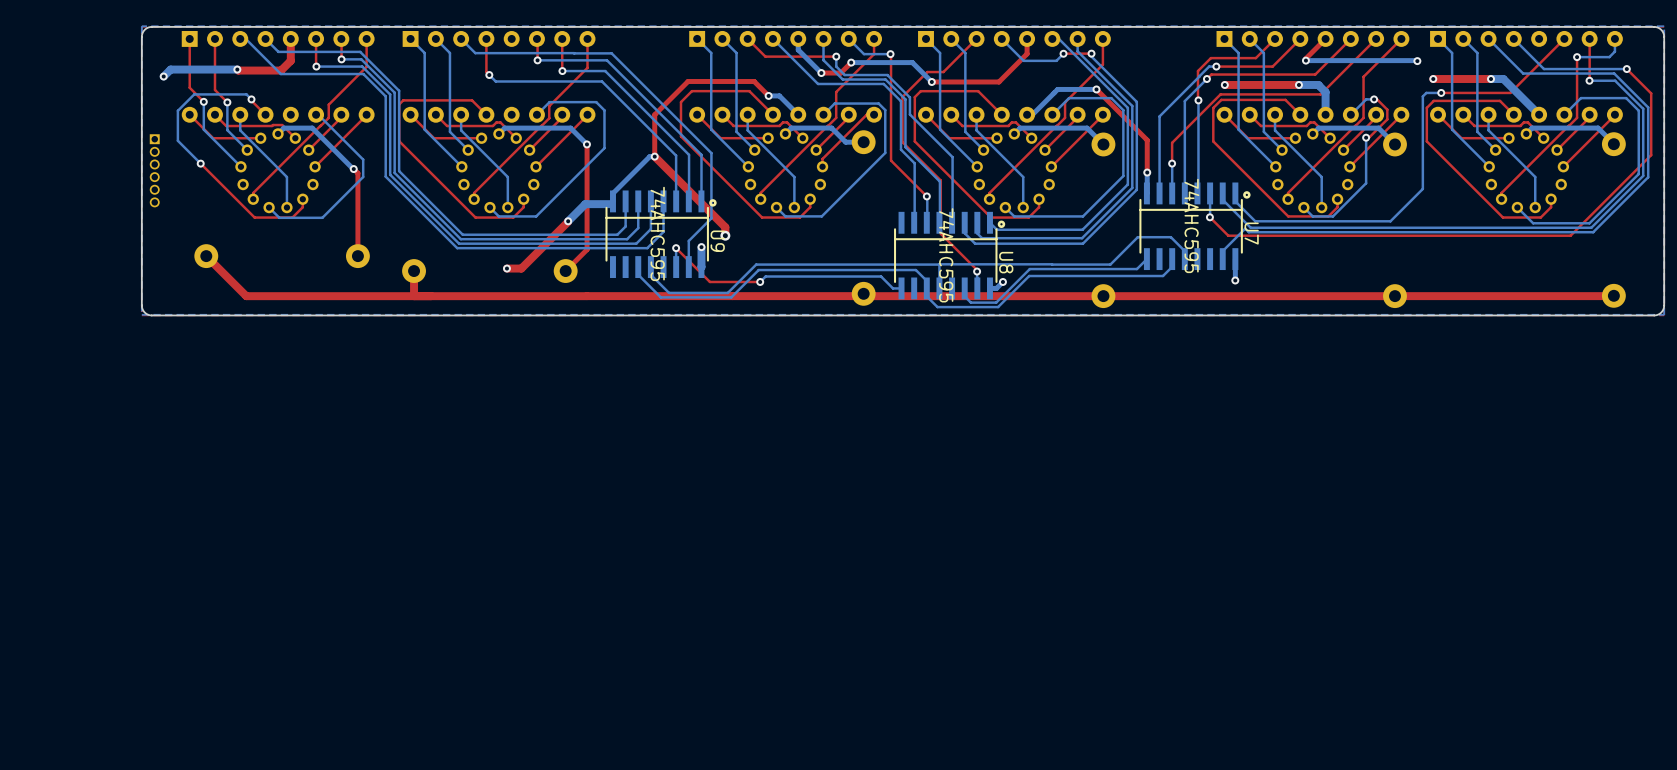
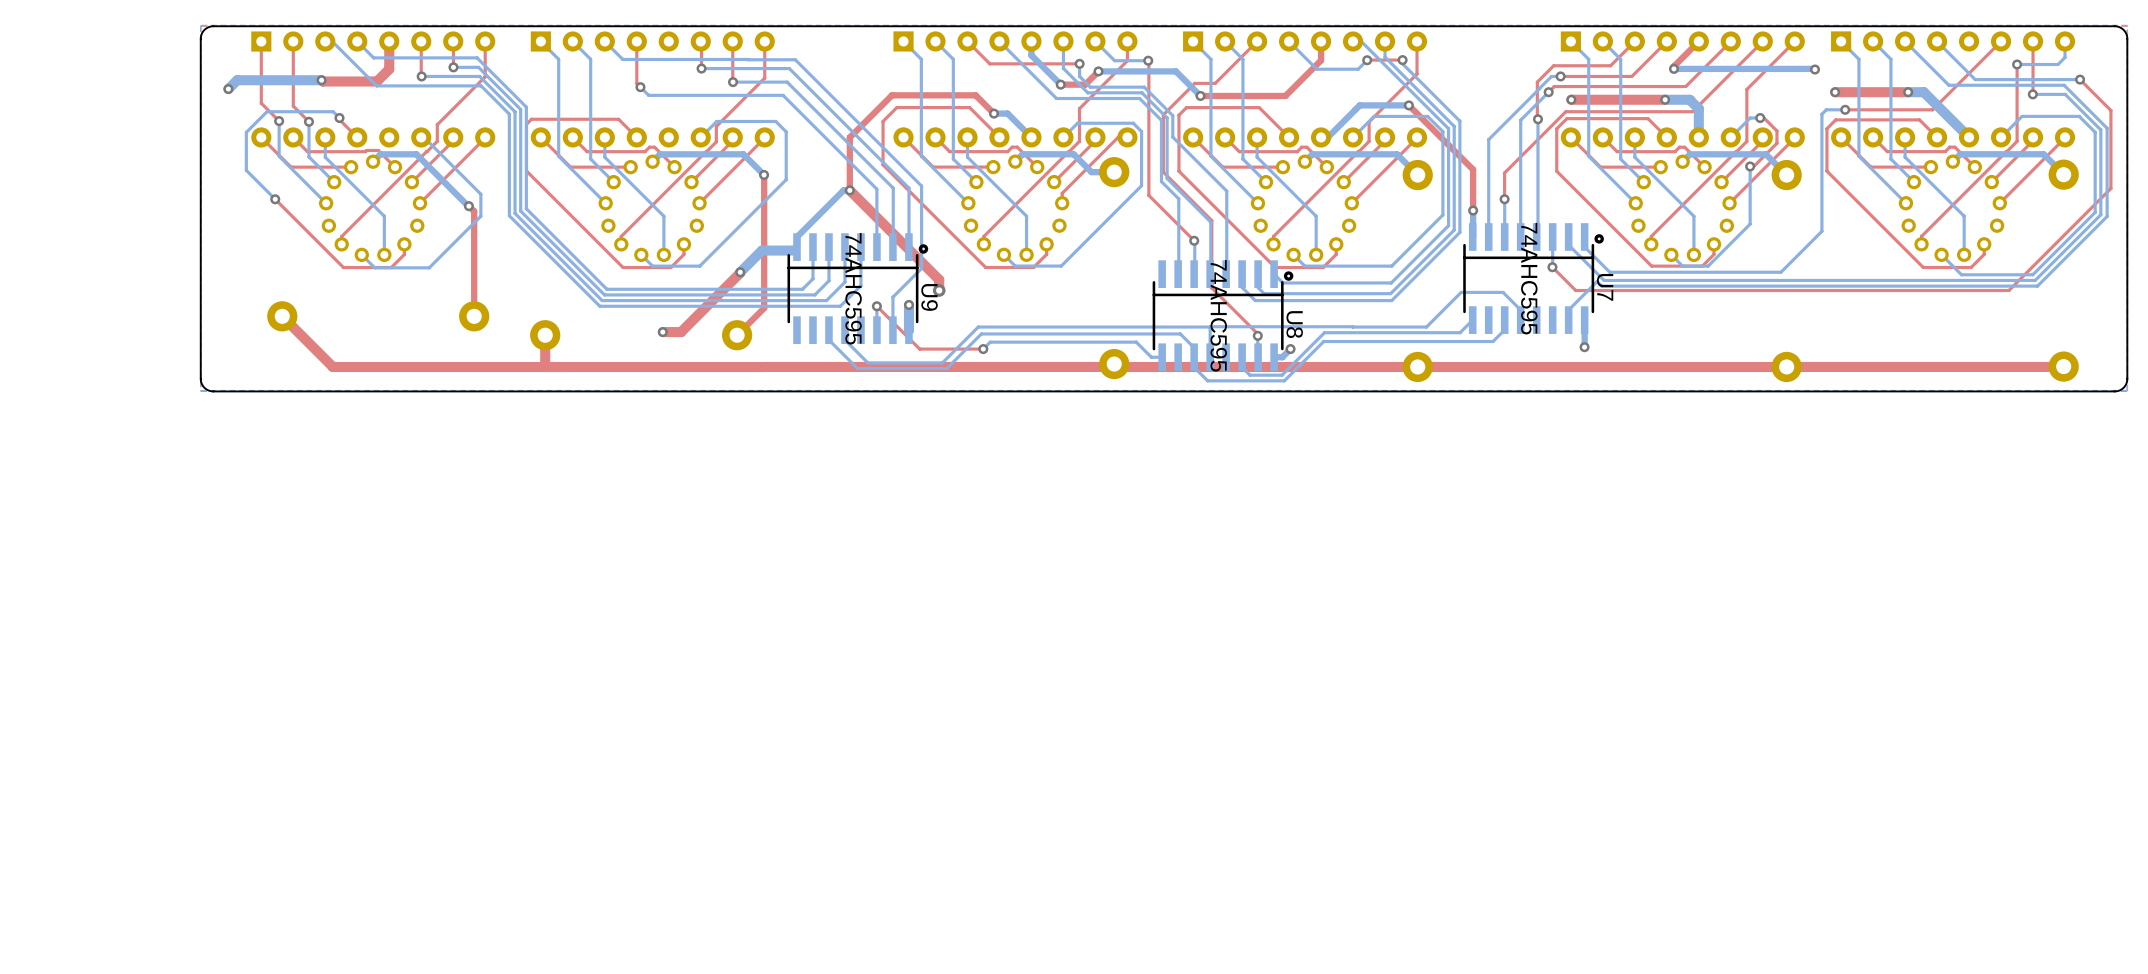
part: (154, 170) -> none

